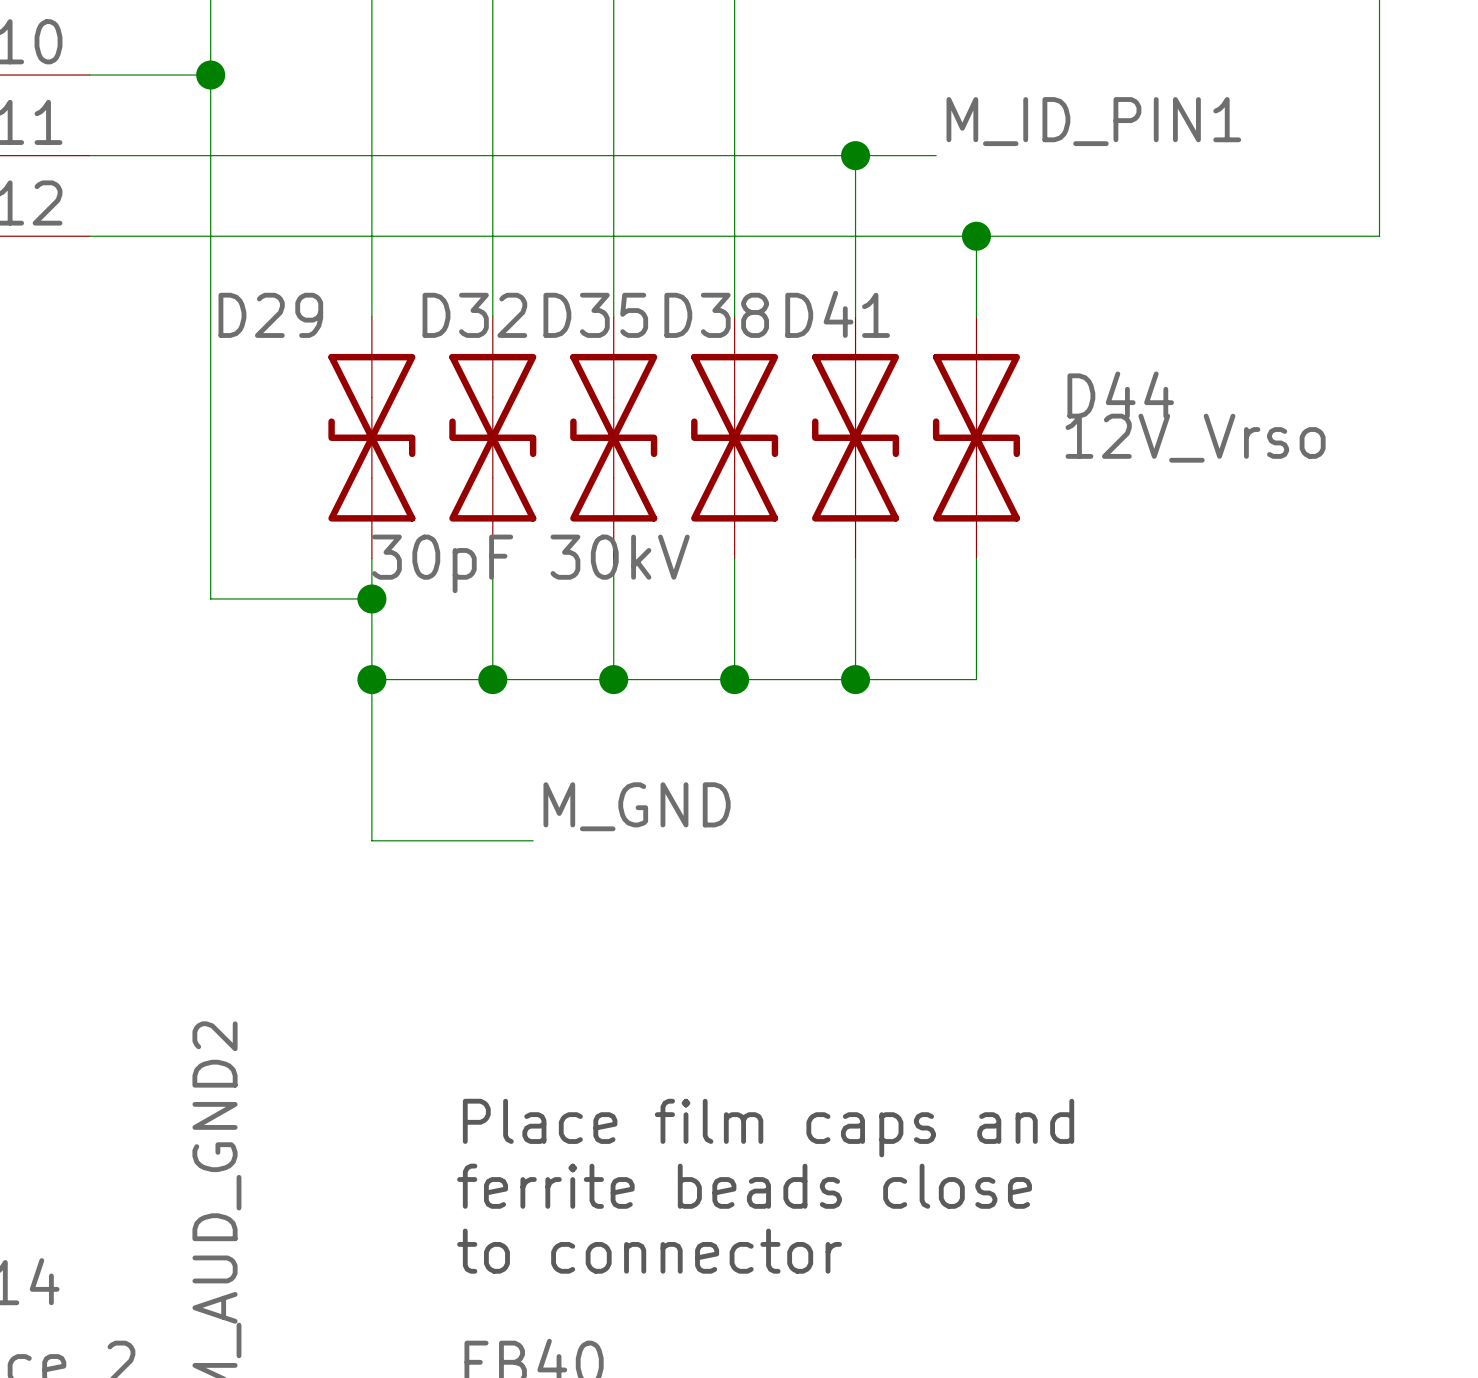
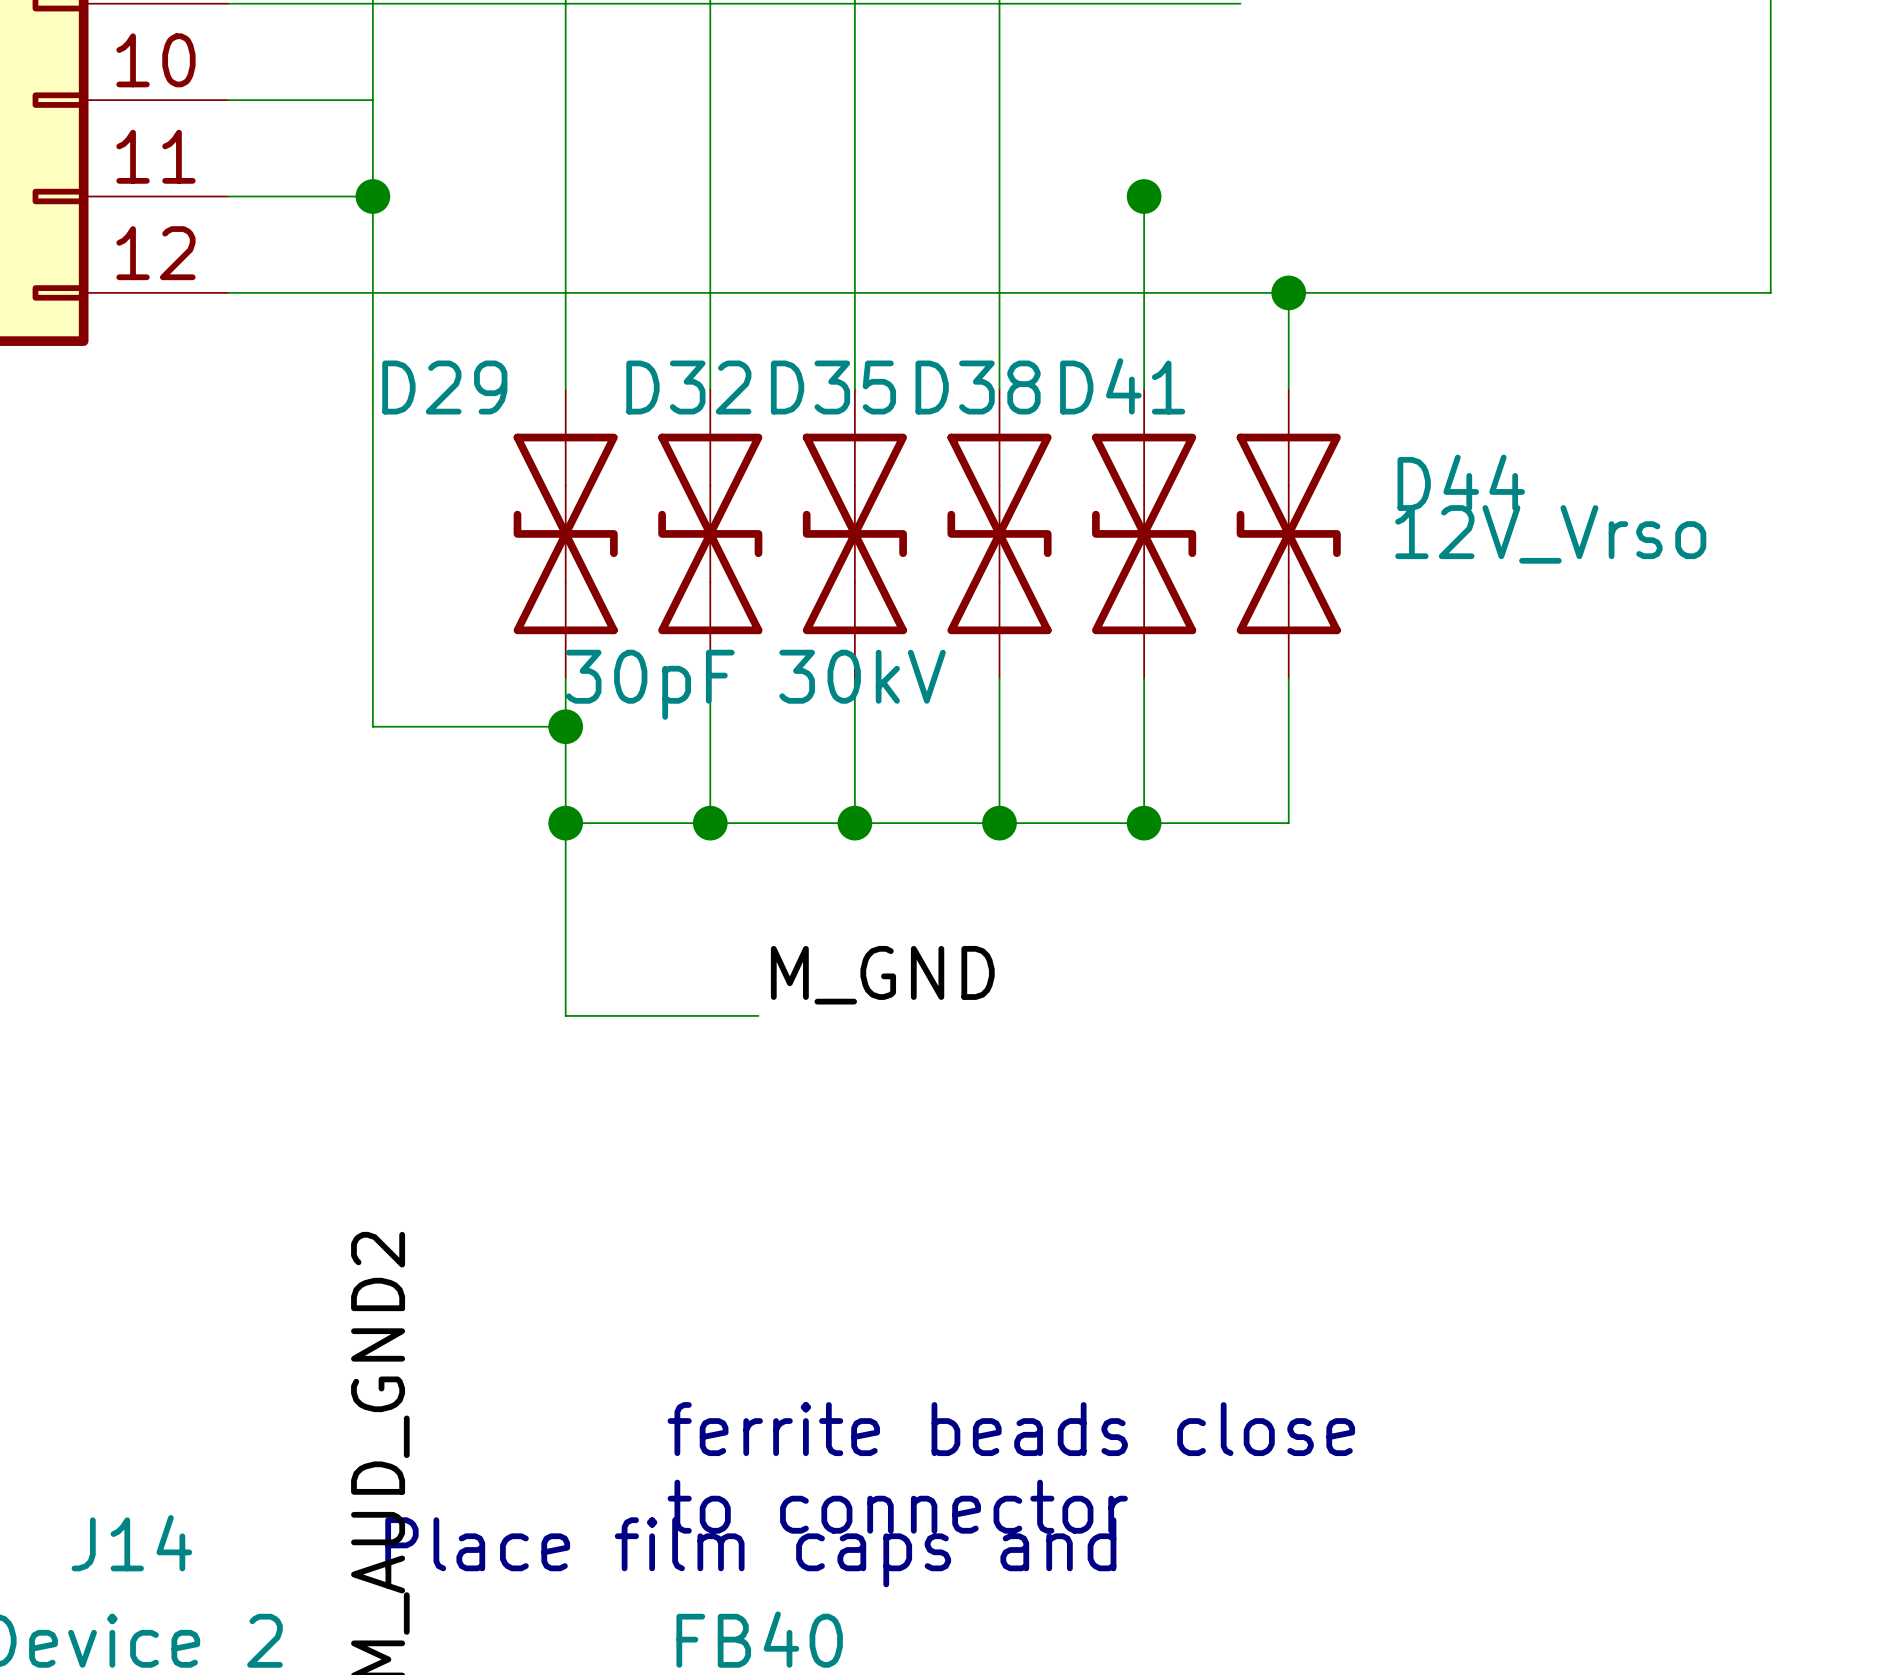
junction position: (210, 75) -> (372, 196)
label: M_ID_PIN1 (1093, 121) -> none
wire: (210, 155) (936, 155) -> none
text position: Place film caps and (768, 1128) -> Place film caps and (750, 1552)

